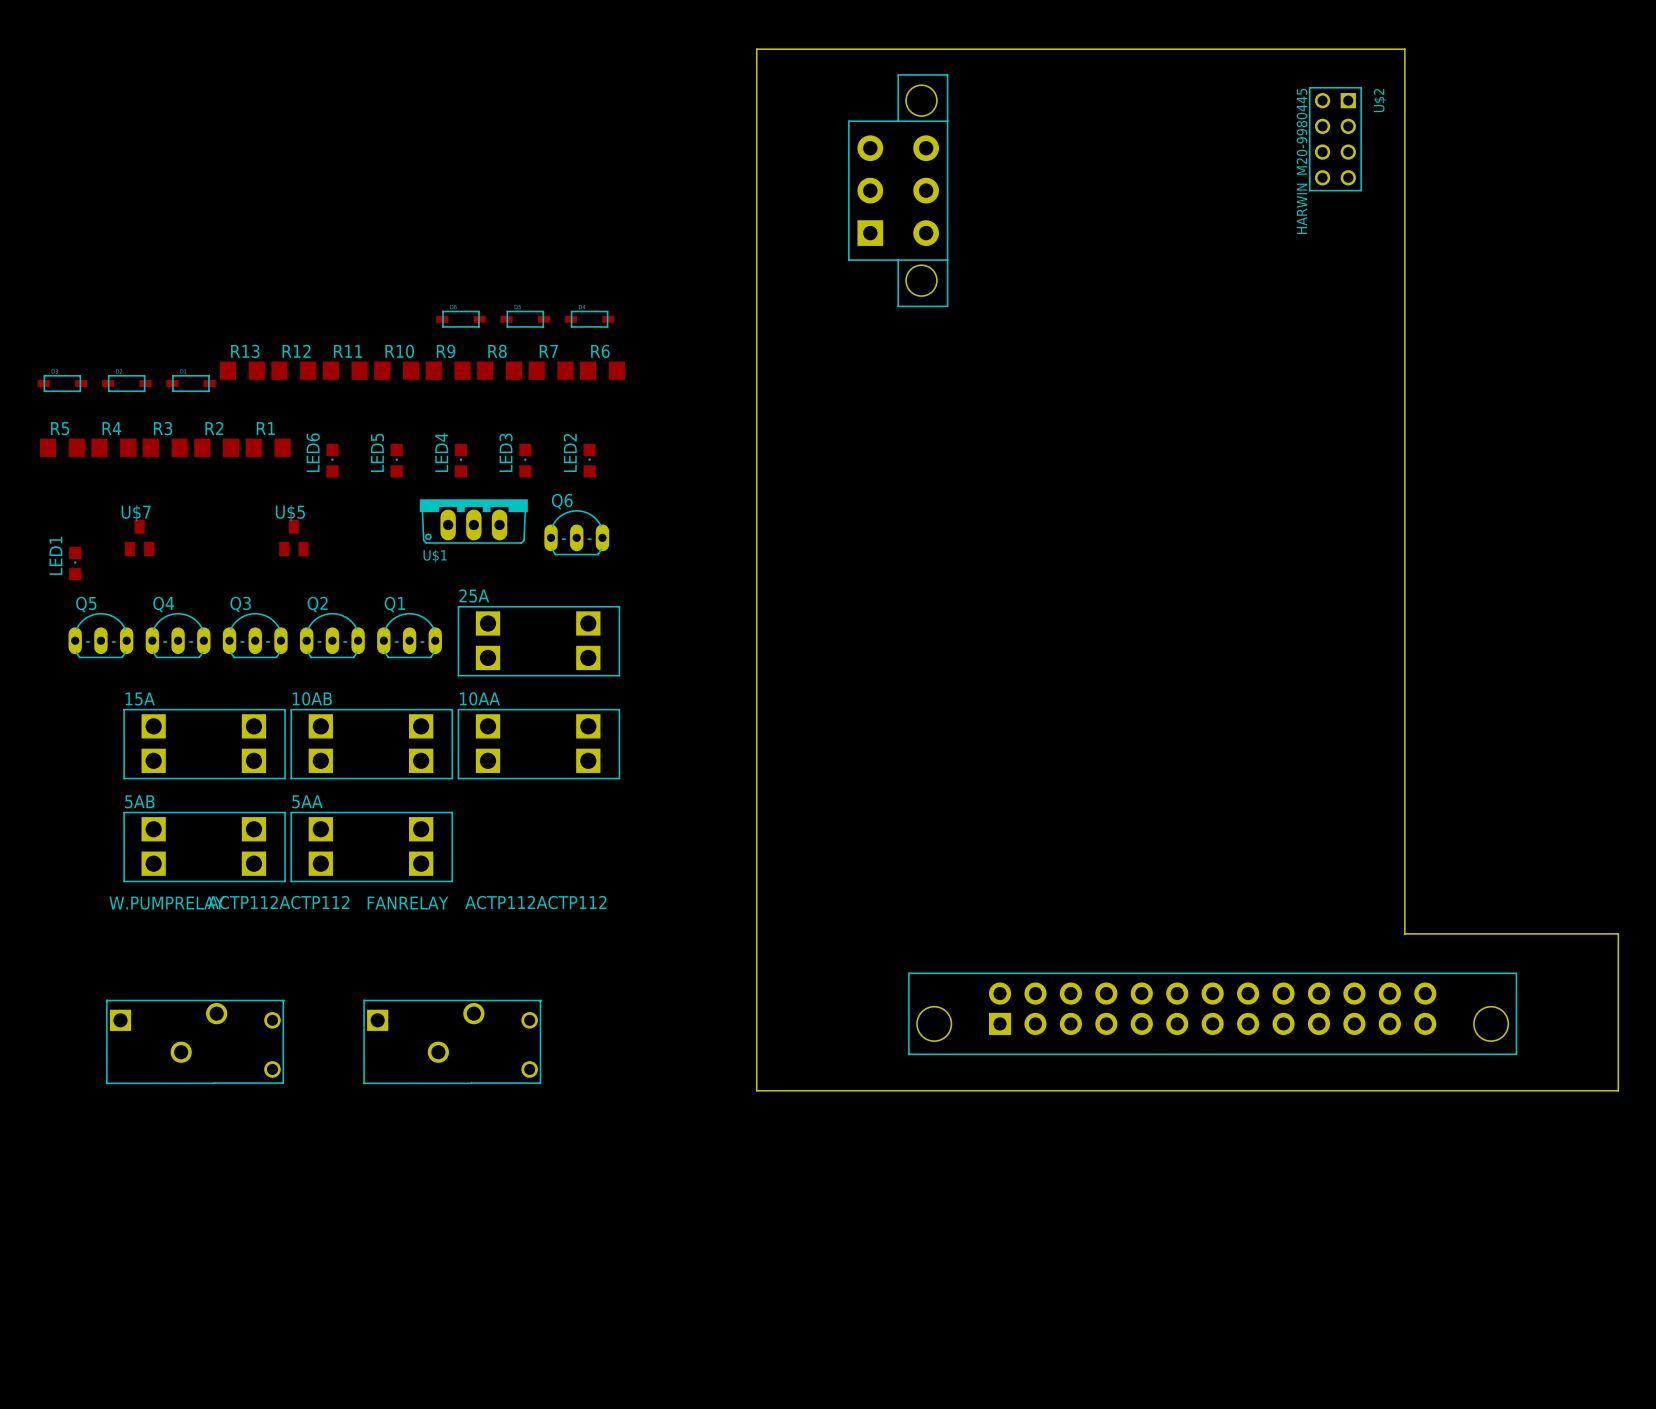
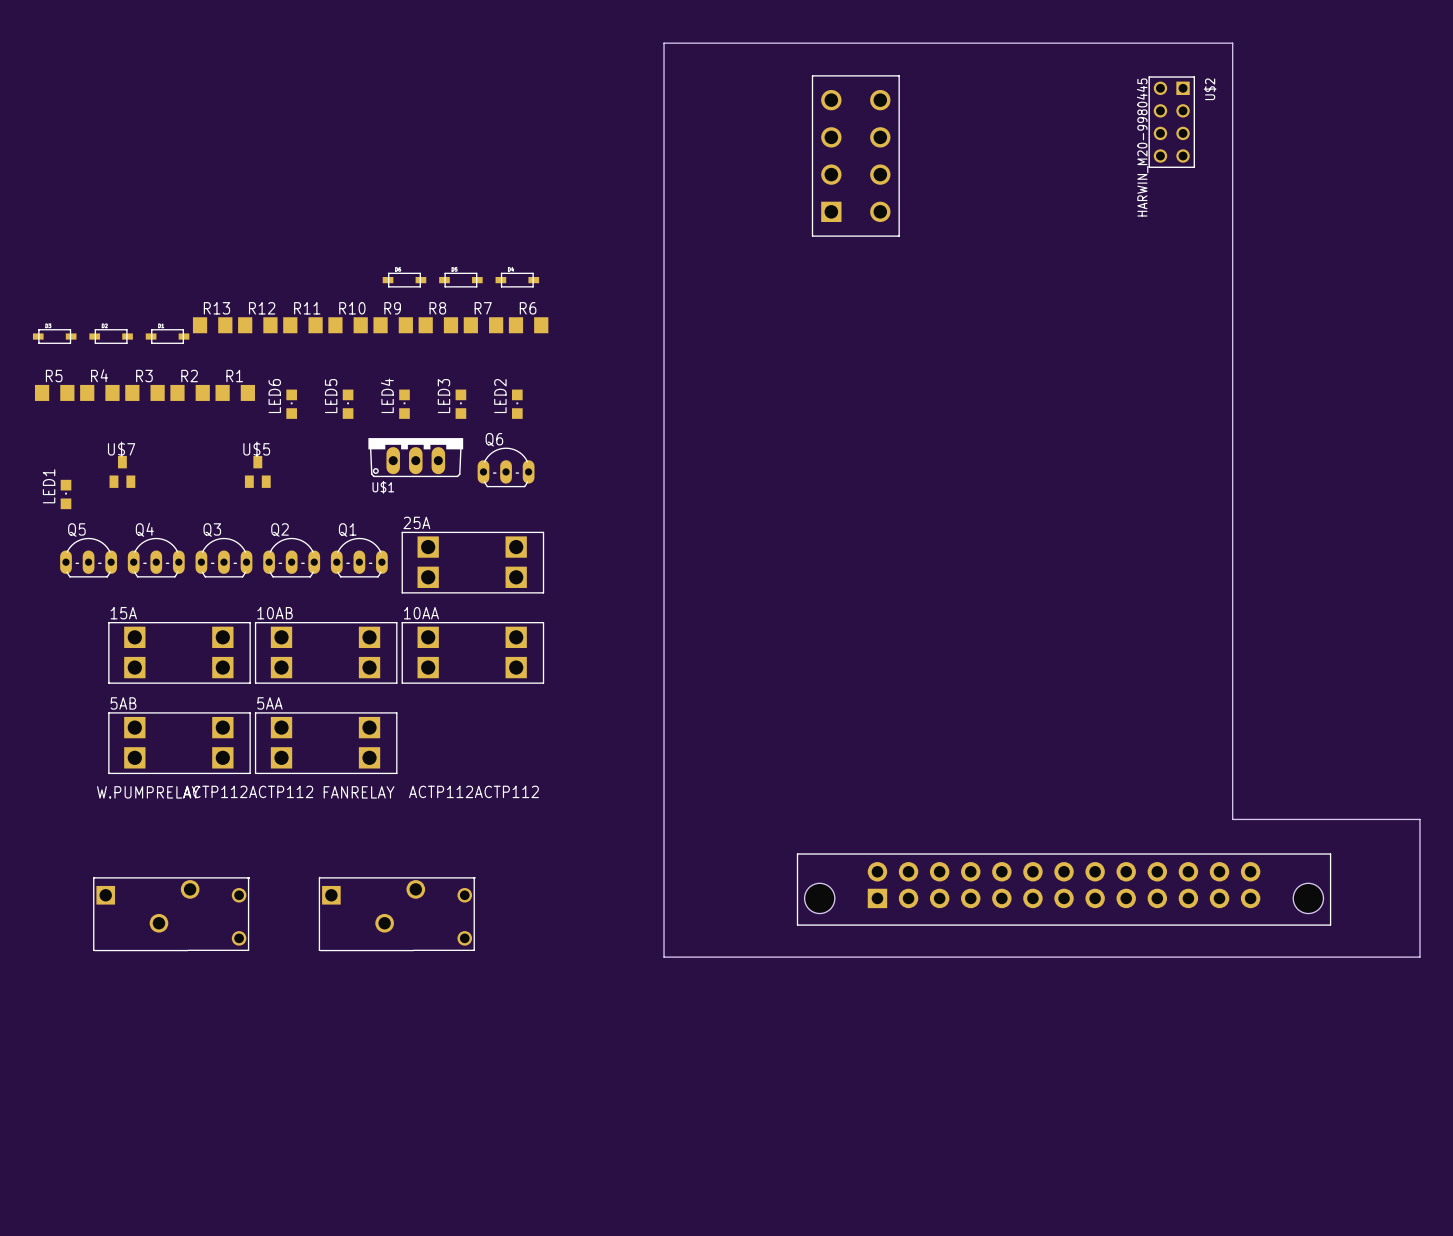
part: none -> (855, 155)
part: (898, 190) -> none

